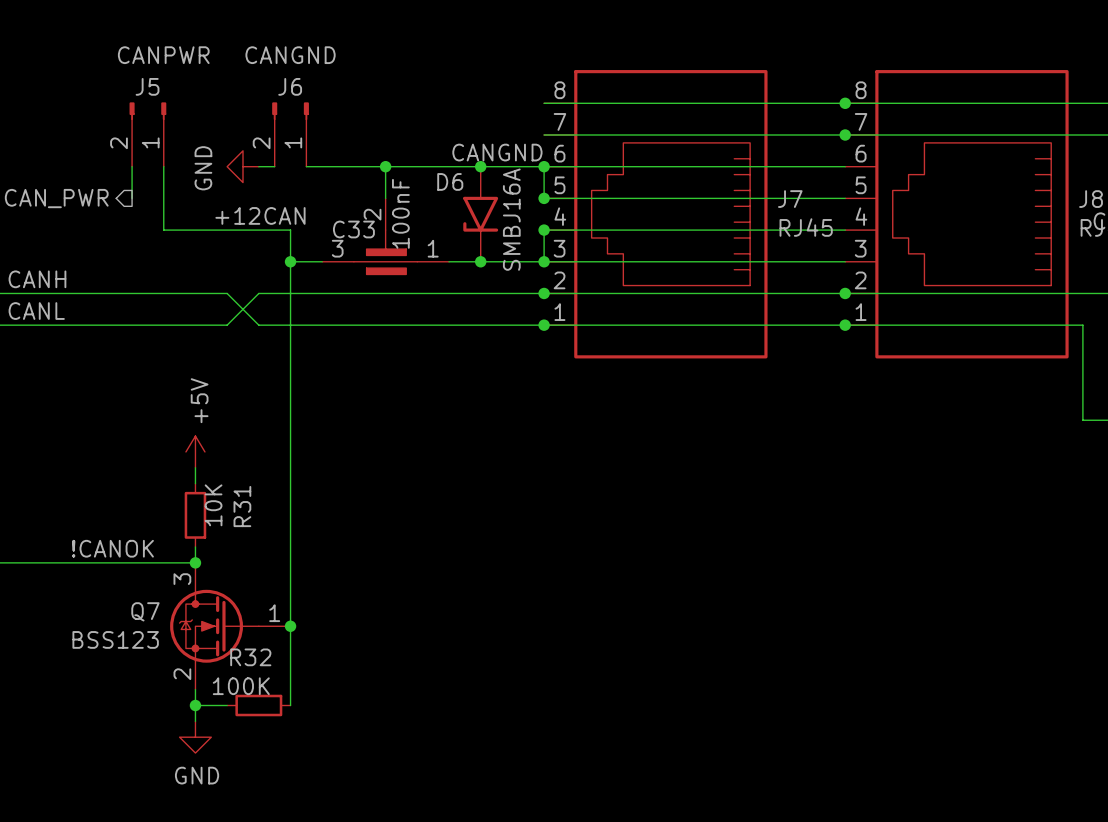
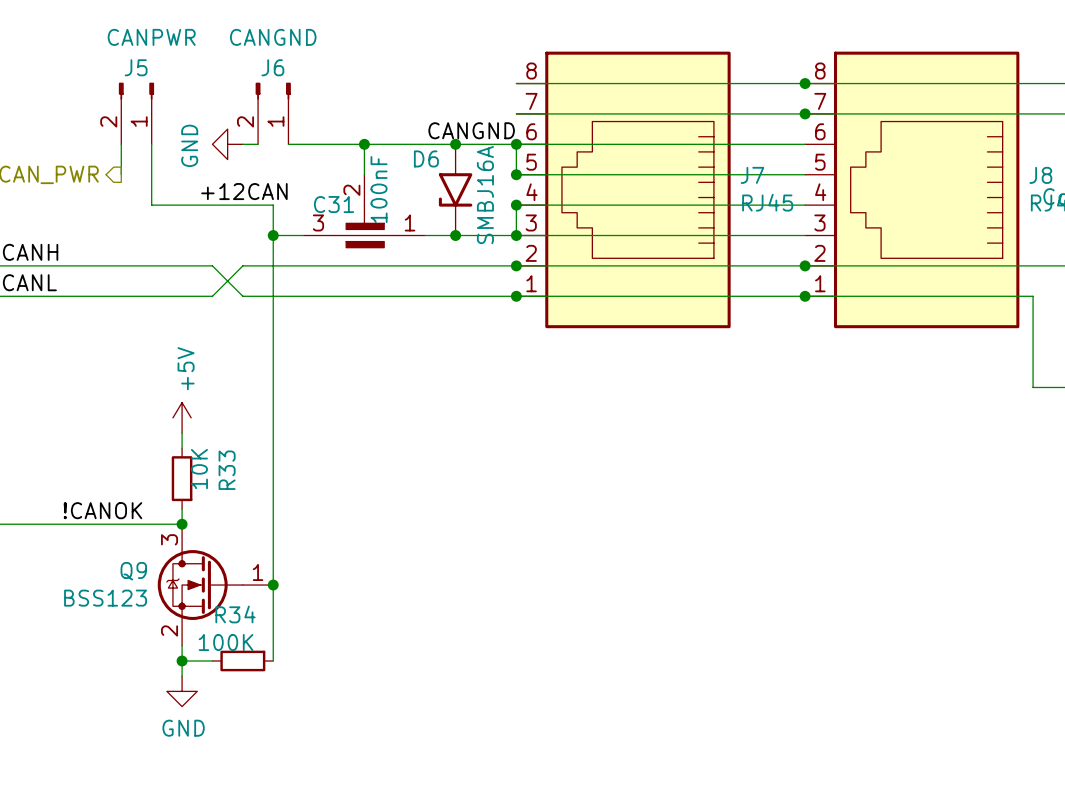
C33 name: C33 (353, 229) -> C31 (334, 204)
R31 name: R31 (242, 506) -> R33 (227, 470)
Q7 name: Q7 (145, 611) -> Q9 (133, 571)
R32 name: R32 (250, 657) -> R34 (235, 614)

